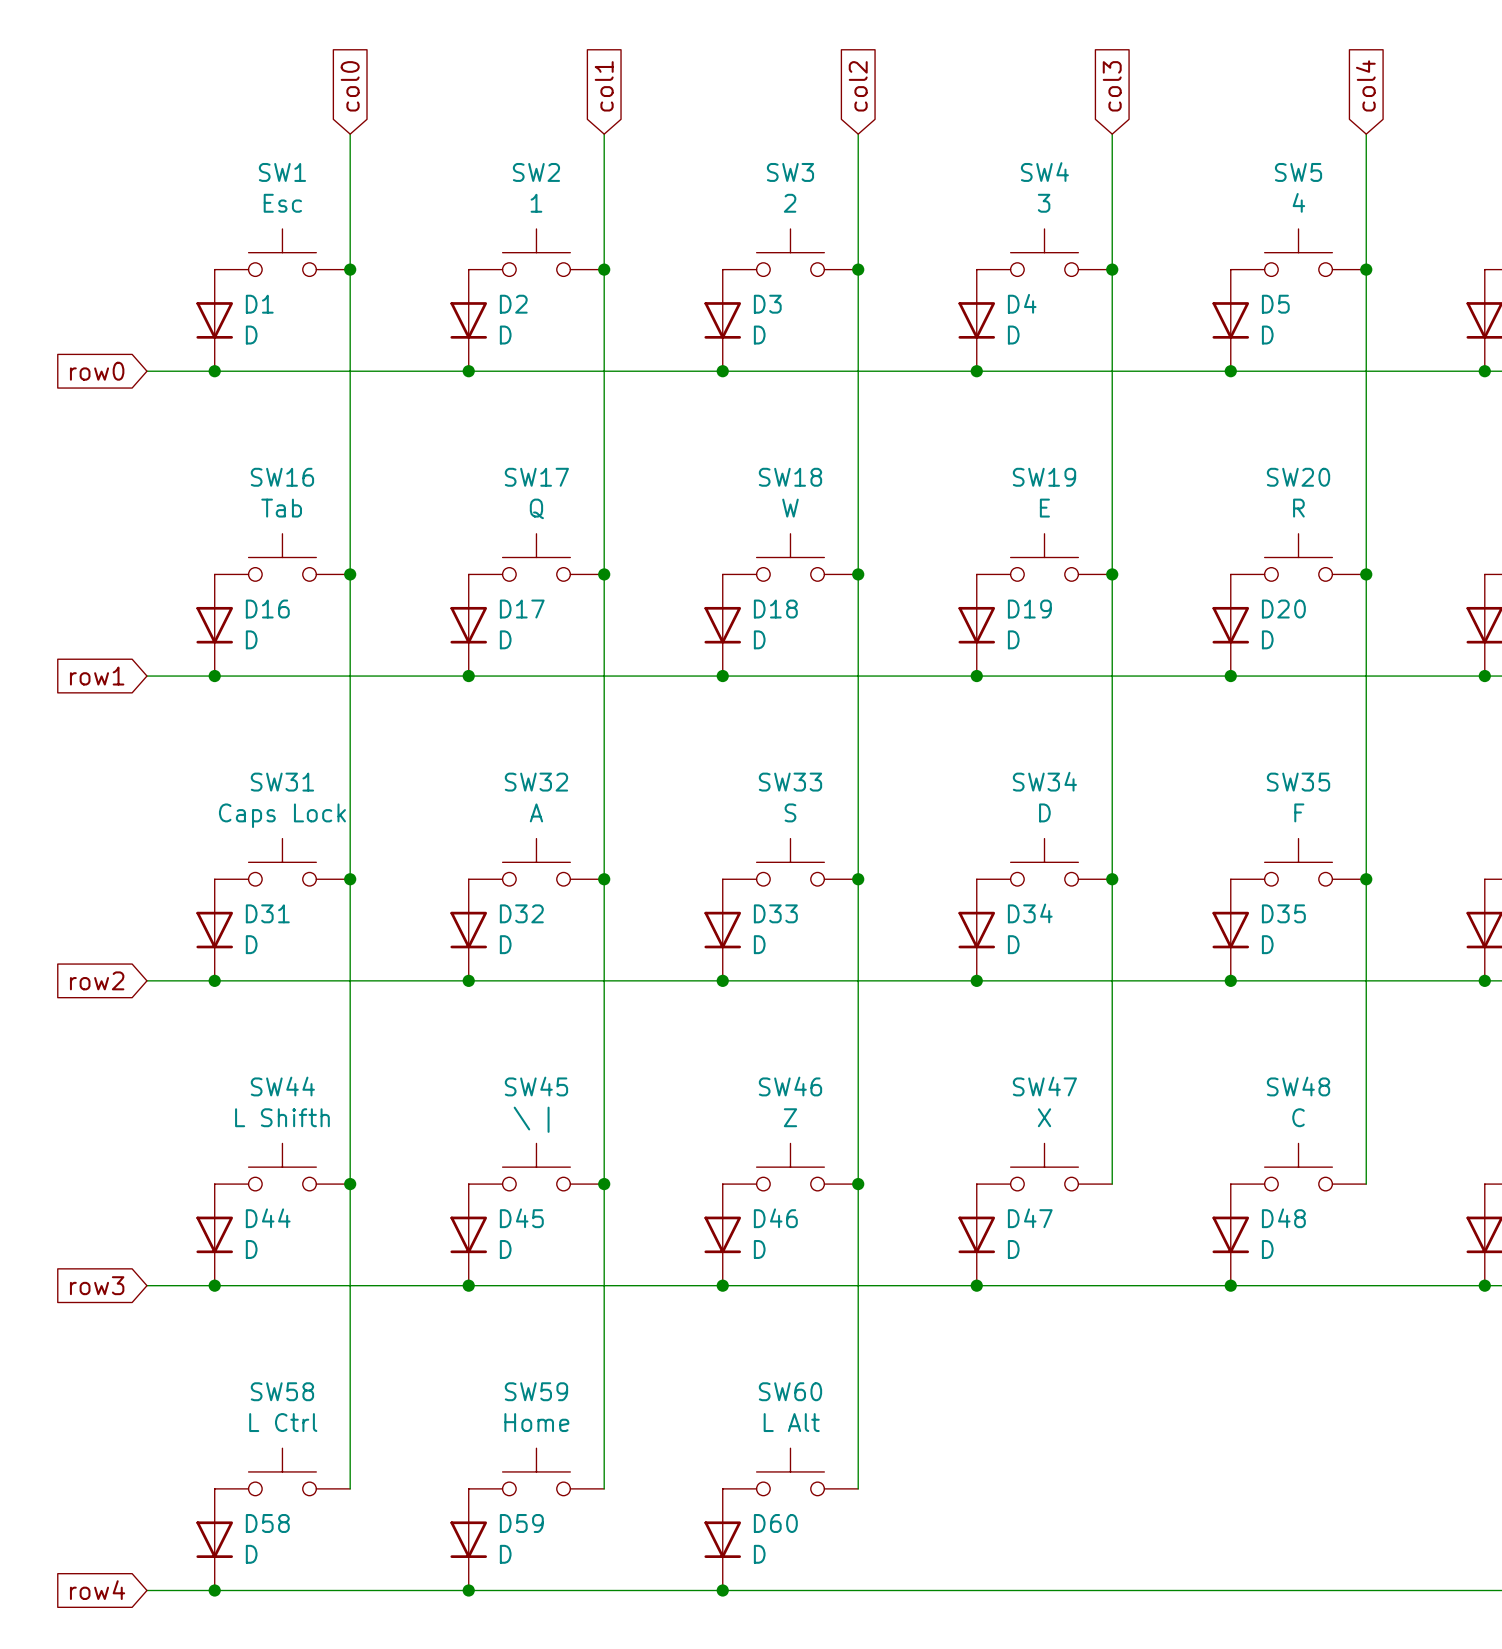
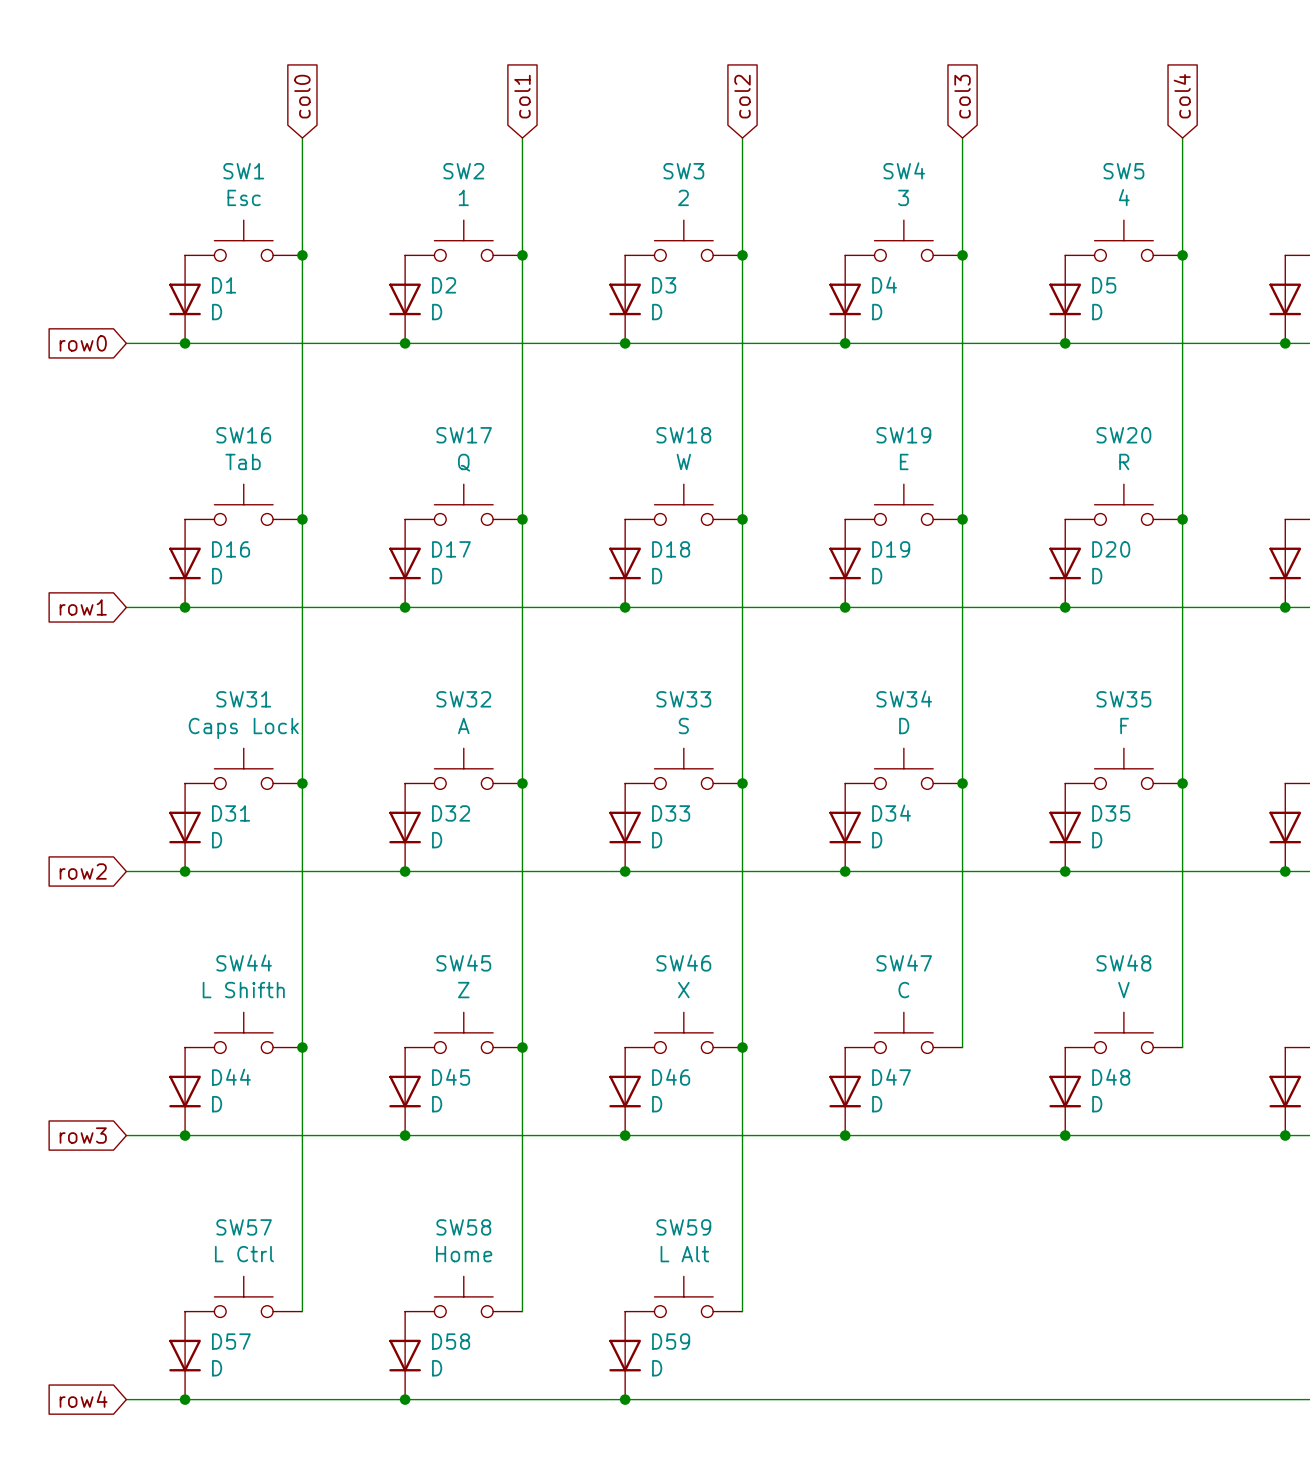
SW46 value: Z (790, 1117) -> X (683, 990)
SW47 value: X (1044, 1117) -> C (903, 990)
SW48 value: C (1298, 1117) -> V (1123, 990)
SW45 value: \ | (531, 1119) -> Z (463, 990)
SW58 name: SW58 (282, 1391) -> SW57 (244, 1227)
SW59 name: SW59 (536, 1391) -> SW58 (463, 1227)
SW60 name: SW60 (790, 1391) -> SW59 (683, 1227)
D58 name: D58 (267, 1523) -> D57 (231, 1341)
D59 name: D59 (521, 1523) -> D58 (451, 1341)
D60 name: D60 (775, 1523) -> D59 (671, 1341)

